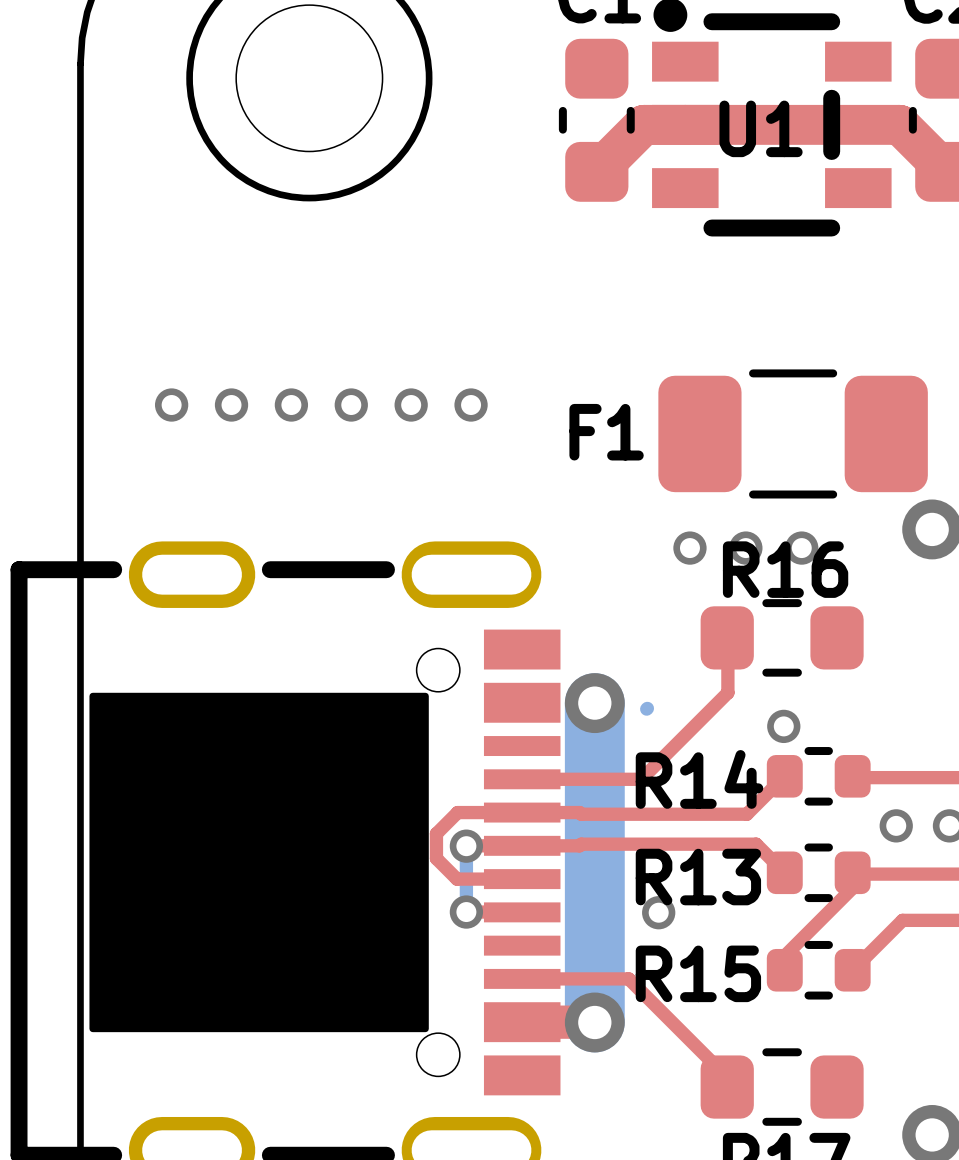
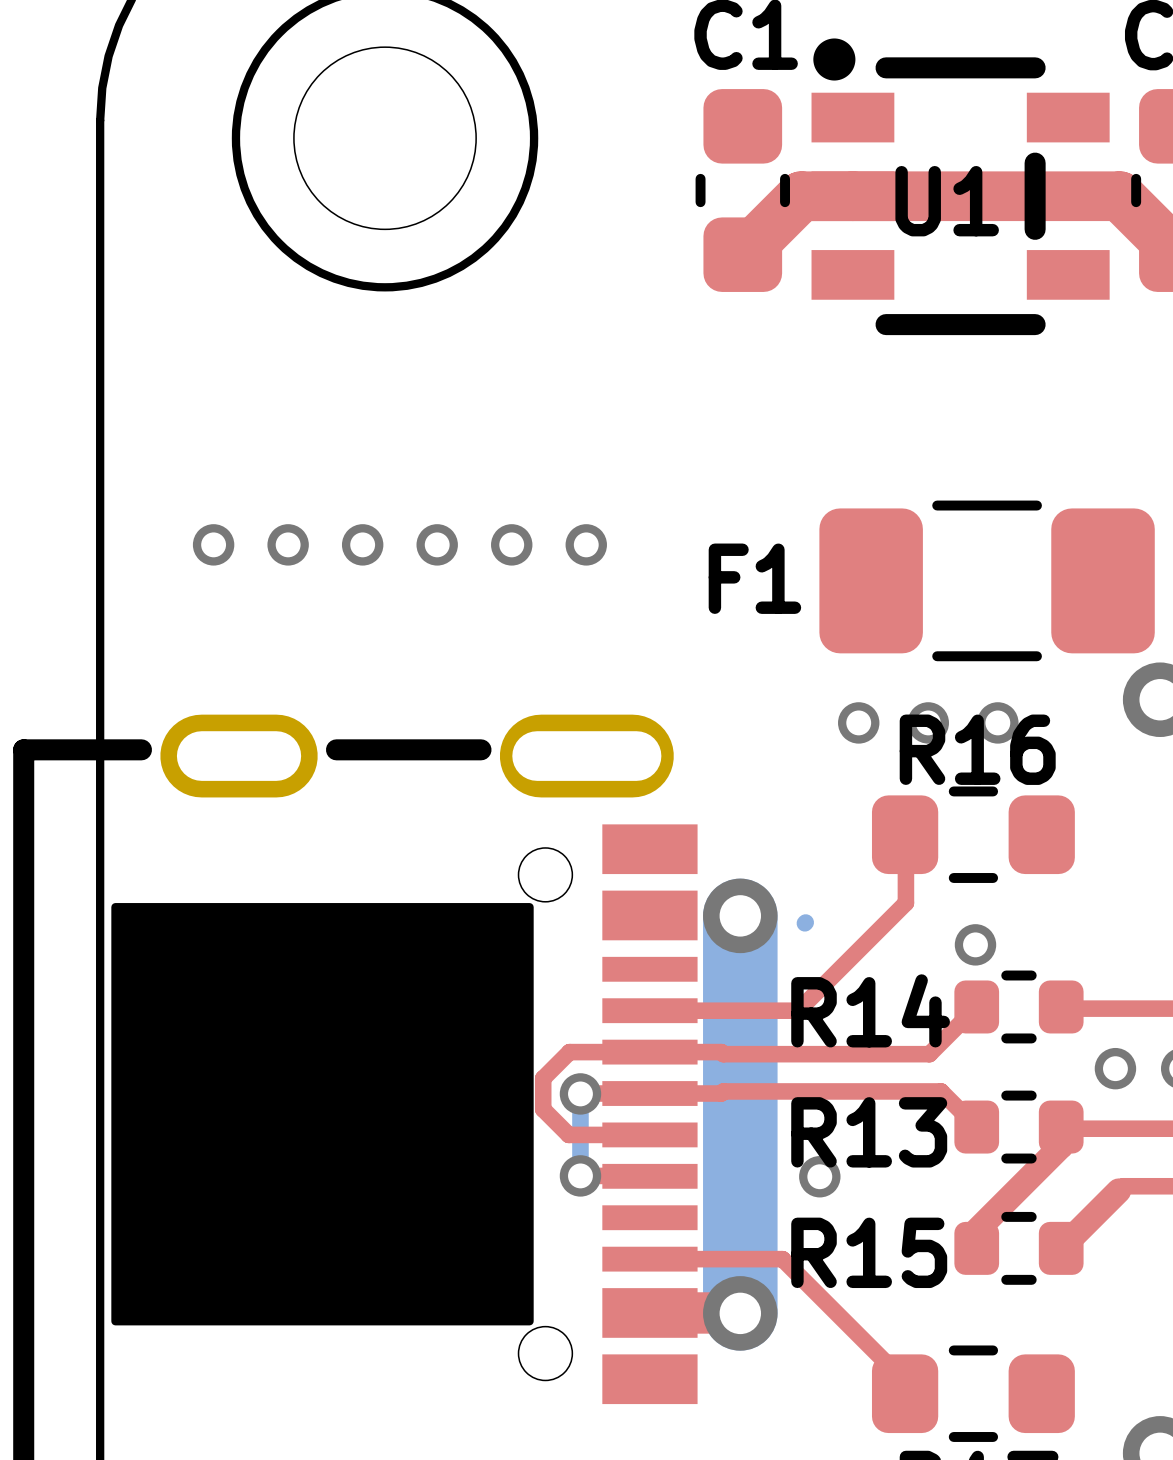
top track width: thin (852, 872) (852, 888) (784, 955) -> thick (1061, 1127) (1061, 1146) (976, 1230)
top track width: thin (898, 924) (852, 970) -> thick (1118, 1190) (1061, 1248)

